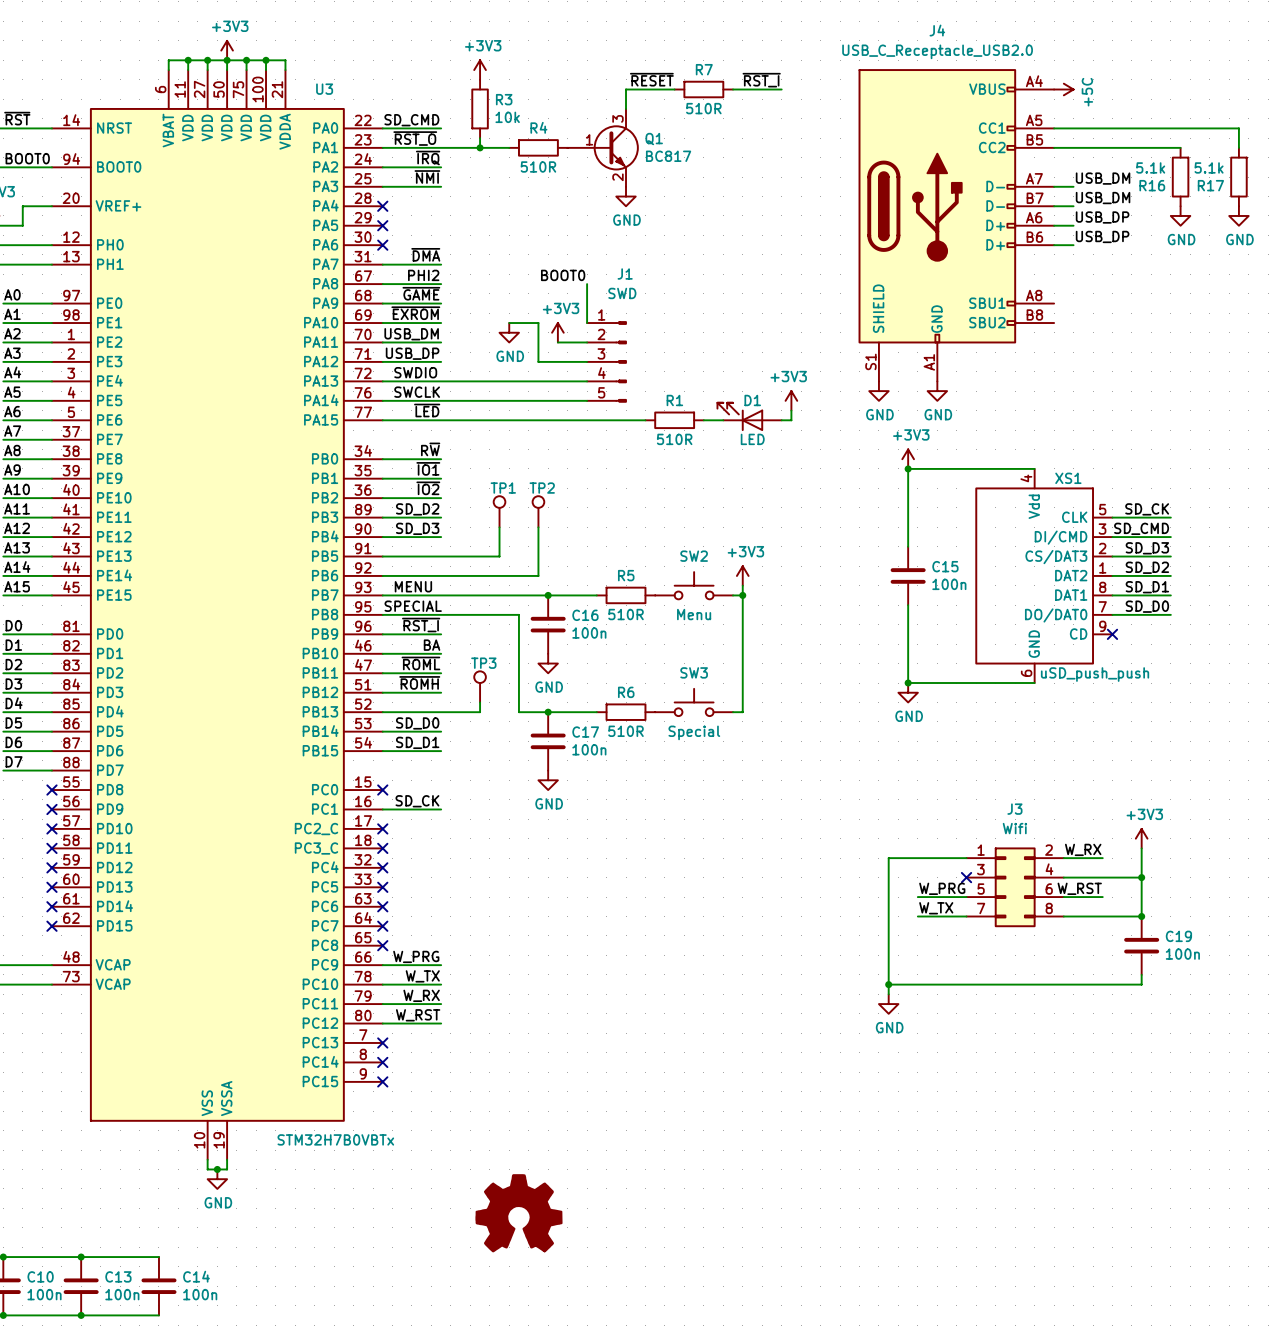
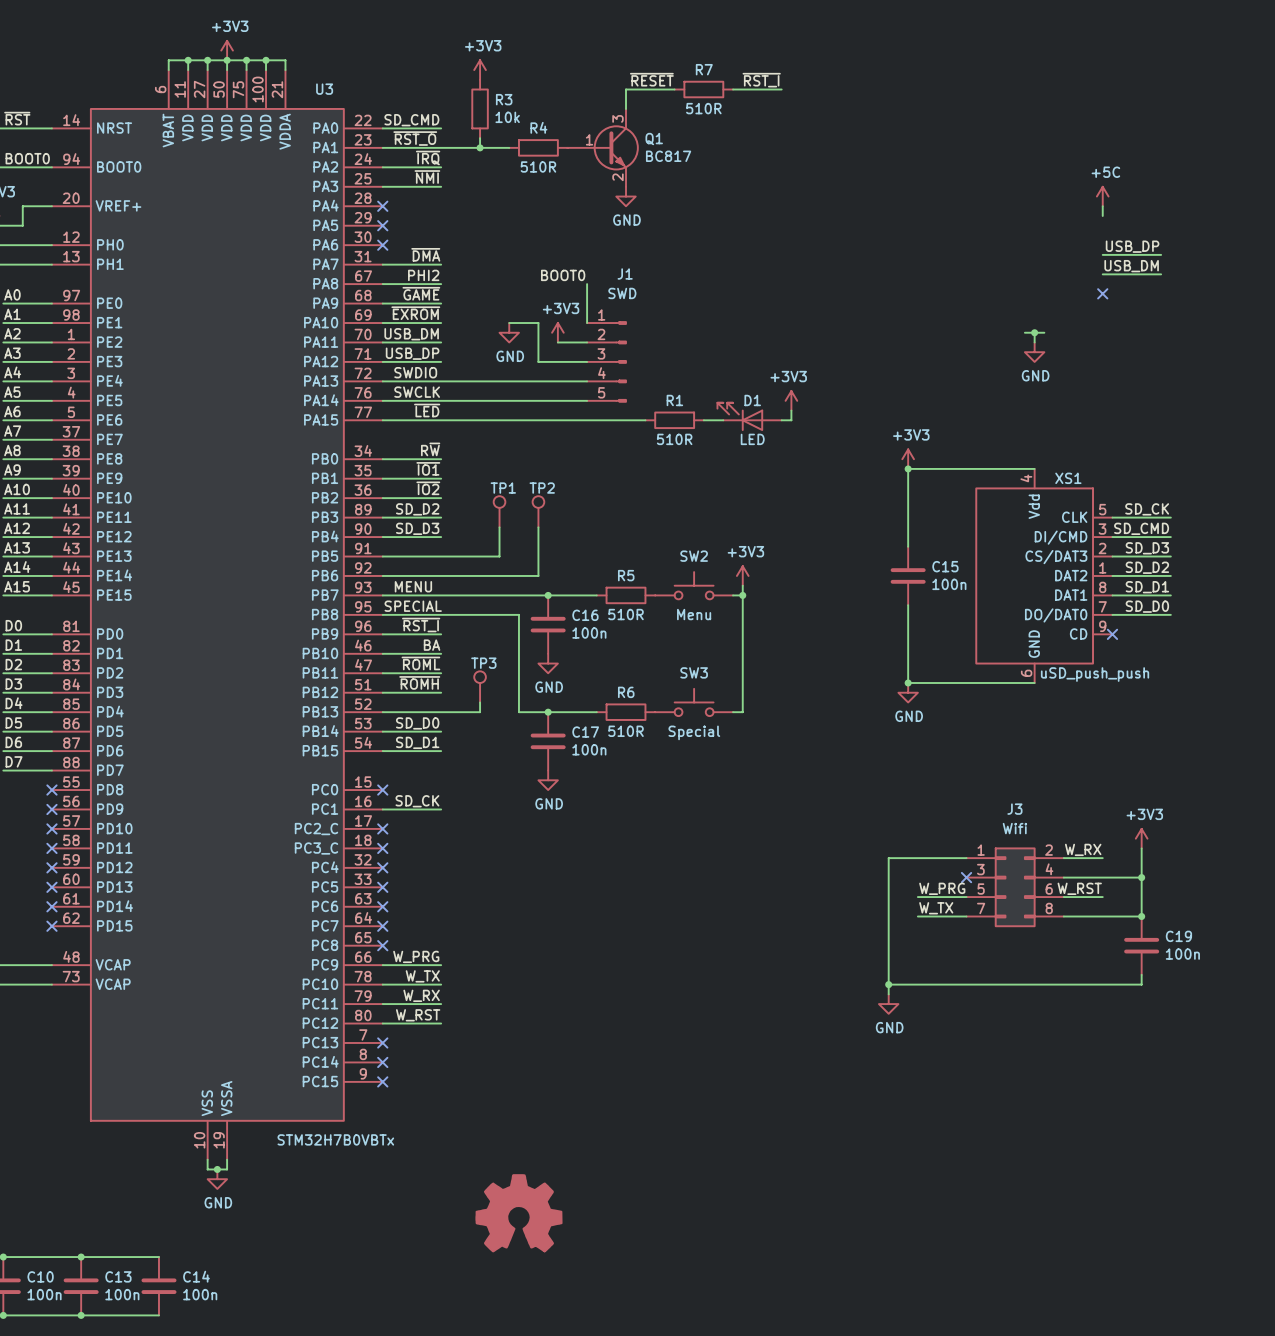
power symbol rotation: 0° (1063, 89) -> 90° counterclockwise (1102, 196)
power symbol position: +5C (1063, 89) -> +5C (1102, 196)
wire: (1054, 128) (1238, 128) (1238, 147) -> none
wire: (1054, 147) (1180, 147) -> none
R16: 5.1k (1180, 177) -> none
R17: 5.1k (1238, 177) -> none
label: USB_DM (1103, 178) -> none
wire: (1054, 186) (1073, 186) -> none
label: USB_DM (1103, 198) -> none
wire: (1054, 206) (1073, 206) -> none
wire: none -> (1102, 206) (1102, 215)
power symbol: GND (1180, 215) -> none
power symbol: GND (1238, 215) -> none
label: USB_DP (1102, 217) -> none
J4: USB_C_Receptacle_USB2.0 (956, 225) -> none
wire: (1054, 225) (1073, 225) -> none
label position: USB_DP (1102, 236) -> USB_DP (1132, 246)
wire: (1054, 245) (1073, 245) -> (1024, 332) (1044, 332)
wire: none -> (1102, 254) (1161, 254)
label: none -> USB_DM (1131, 266)
wire: none -> (1102, 274) (1161, 274)
no-connect mark: none -> (1102, 293)
wire: none -> (1034, 332) (1034, 342)
junction: none -> (1034, 332)
power symbol: none -> GND (1034, 352)
power symbol: GND (878, 391) -> none
power symbol: GND (937, 391) -> none

